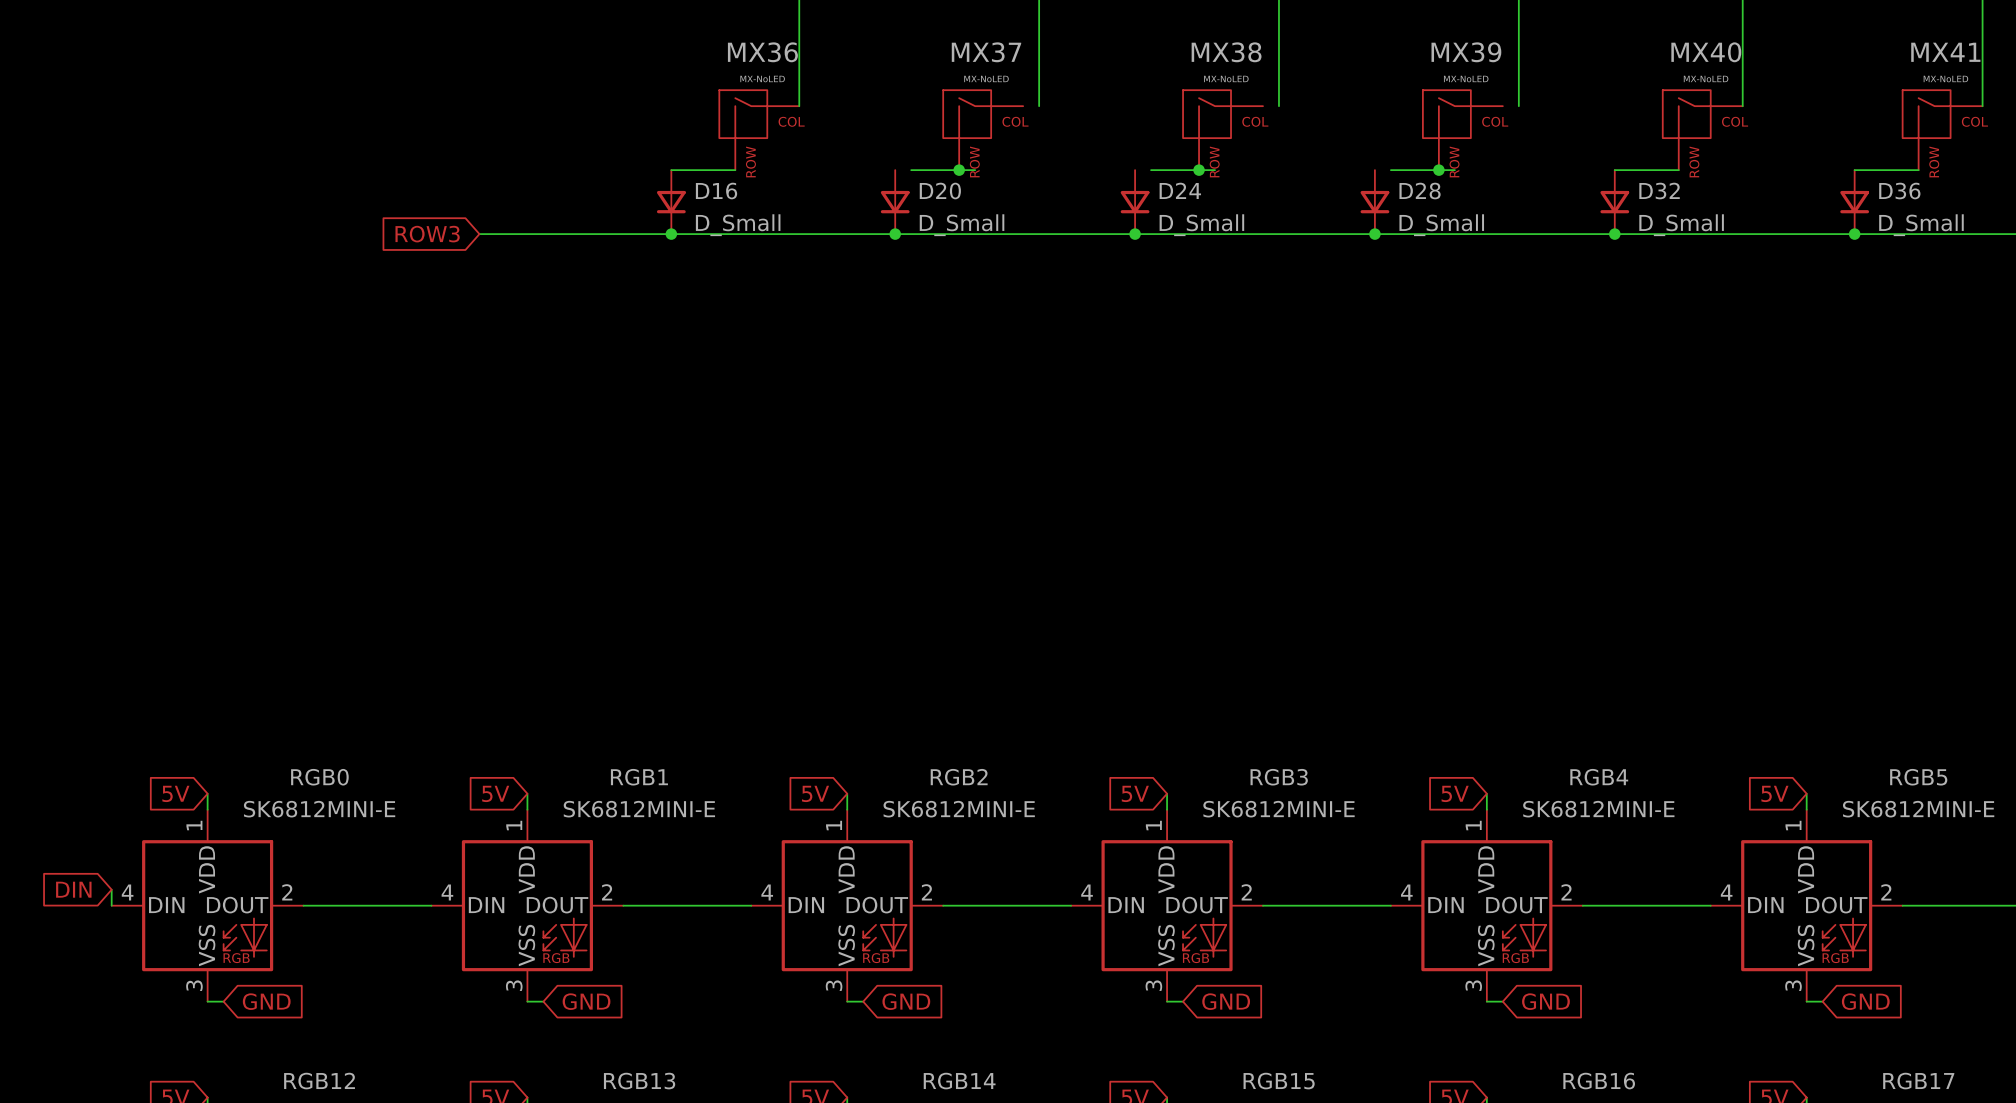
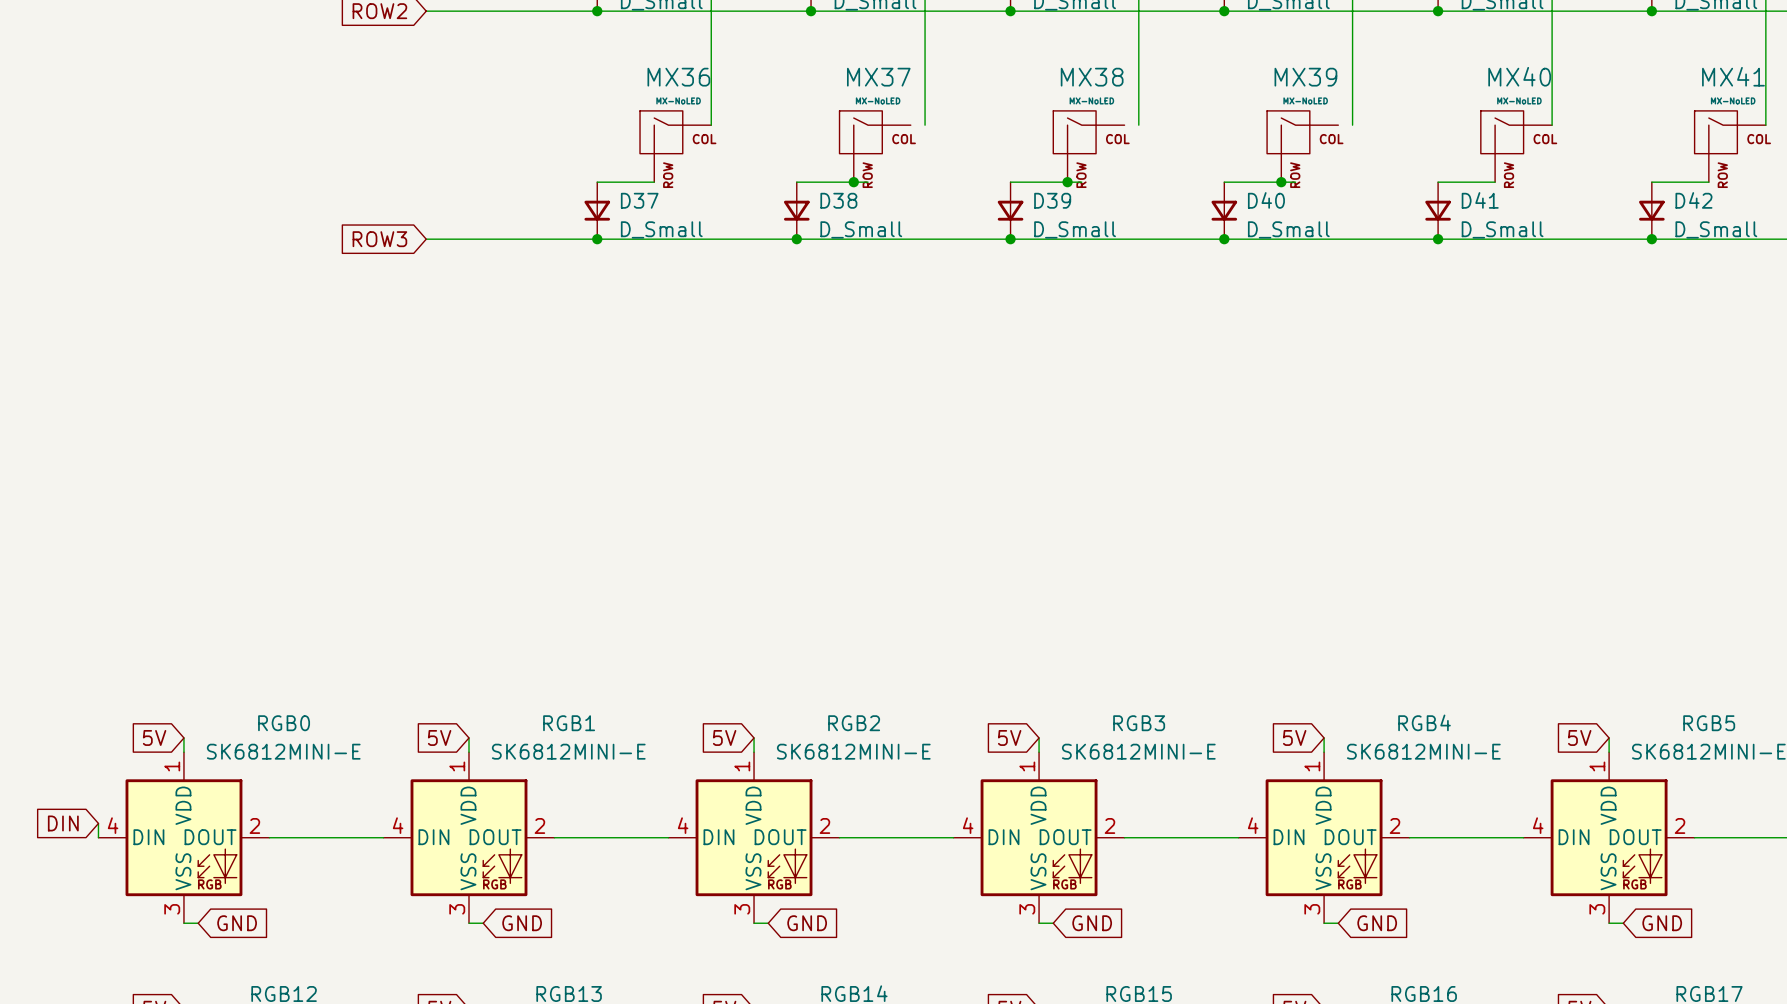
wire: none -> (796, 182) (811, 182)
wire: none -> (1010, 182) (1024, 182)
wire: none -> (1224, 182) (1238, 182)
D24 name: D24 (1180, 190) -> D39 (1052, 200)
D16 name: D16 (716, 191) -> D37 (639, 200)
D20 name: D20 (940, 191) -> D38 (838, 200)
D28 name: D28 (1420, 191) -> D40 (1266, 200)
D32 name: D32 (1659, 191) -> D41 (1480, 200)
D36 name: D36 (1899, 191) -> D42 (1693, 200)

